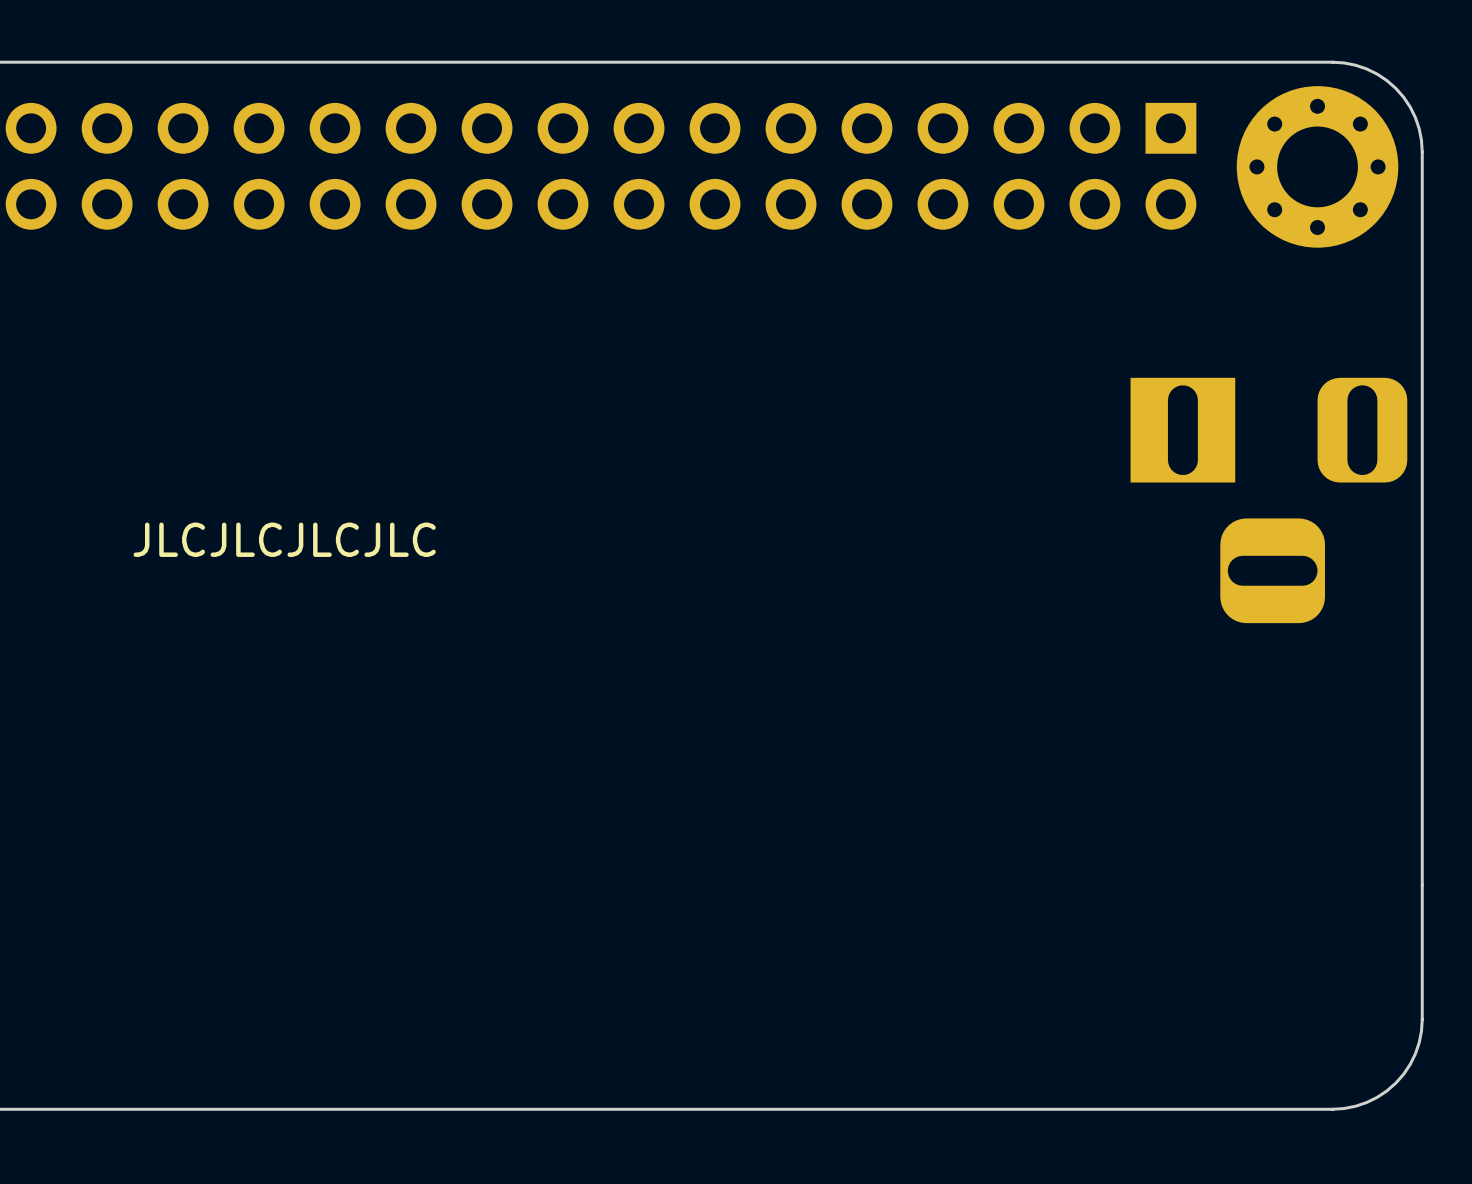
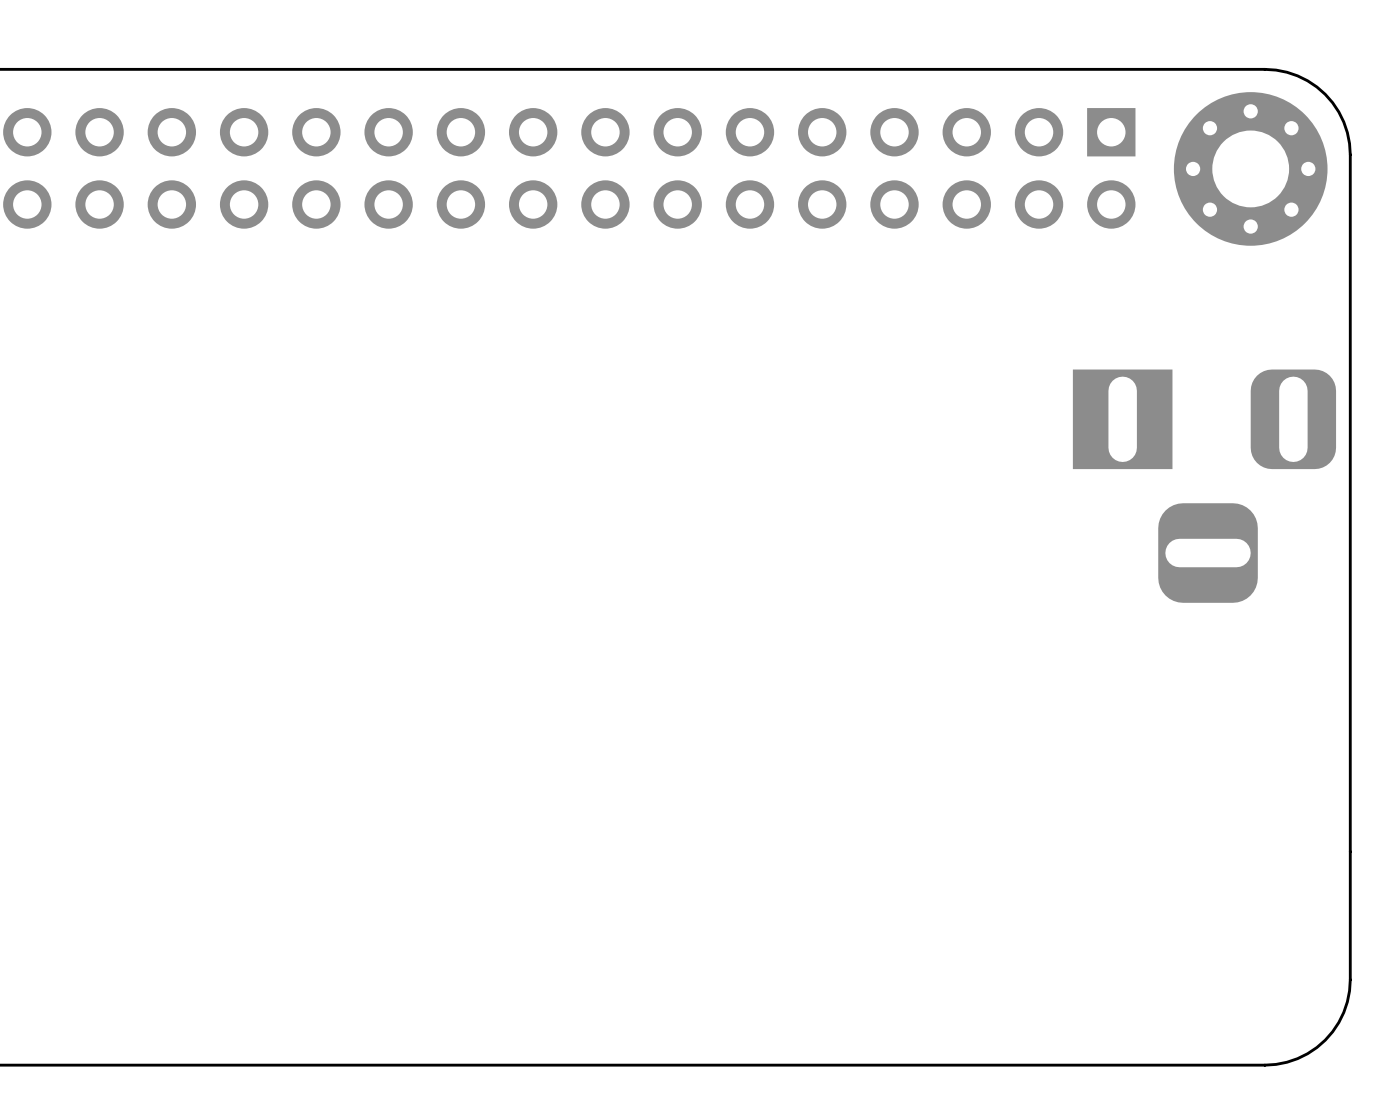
text: JLCJLCJLCJLC (284, 539) -> none

